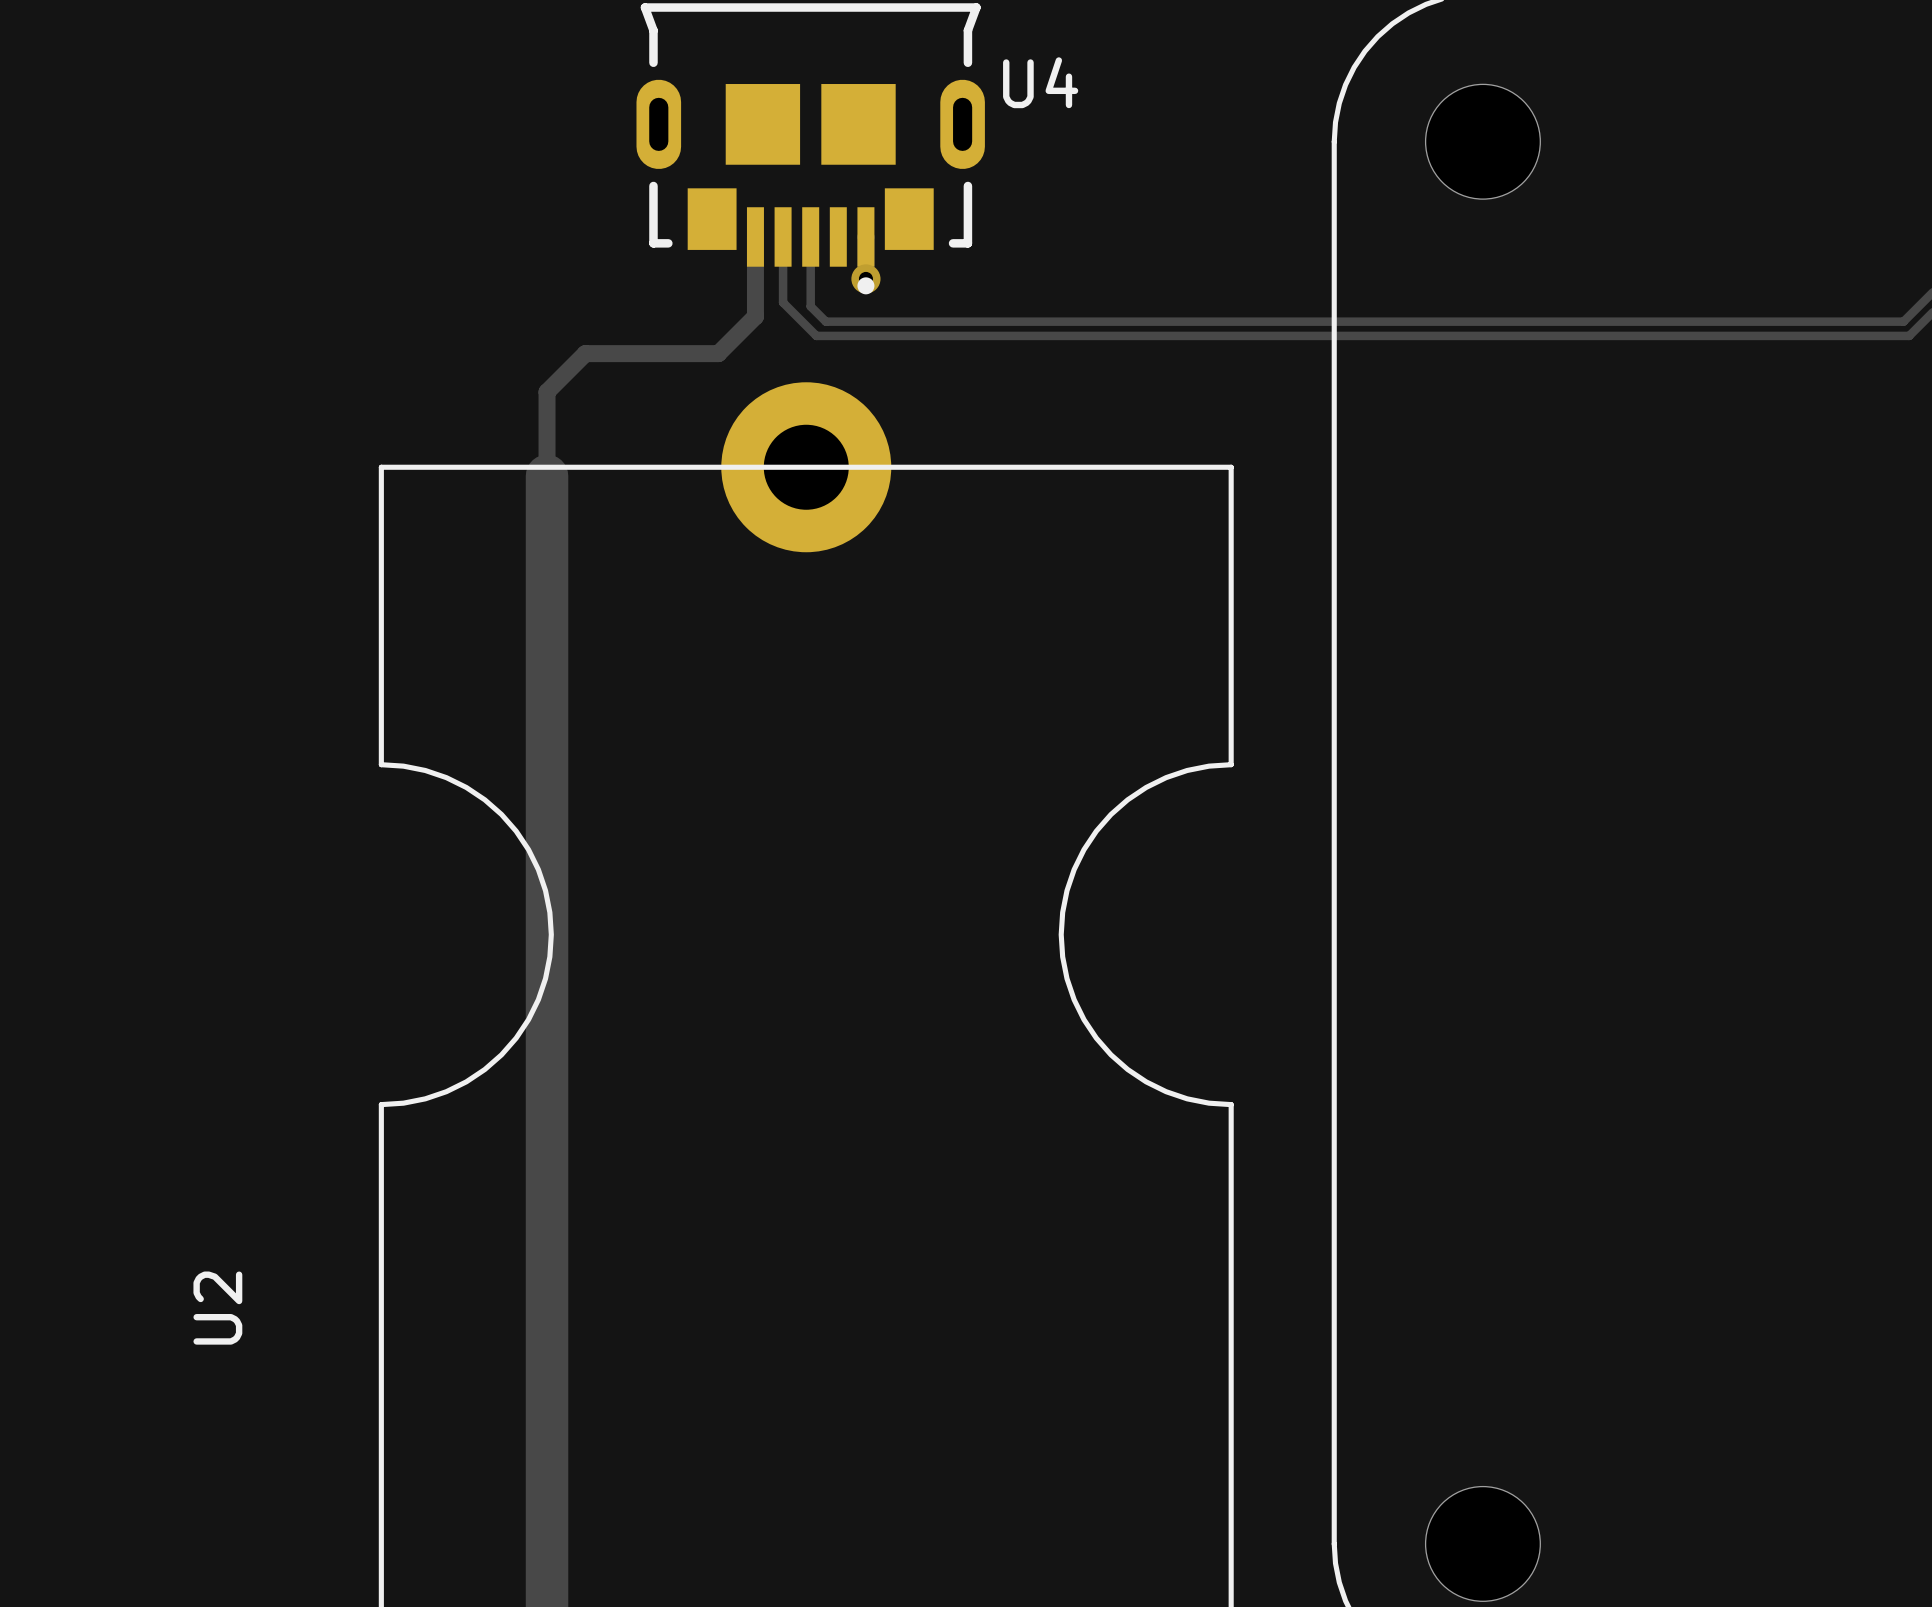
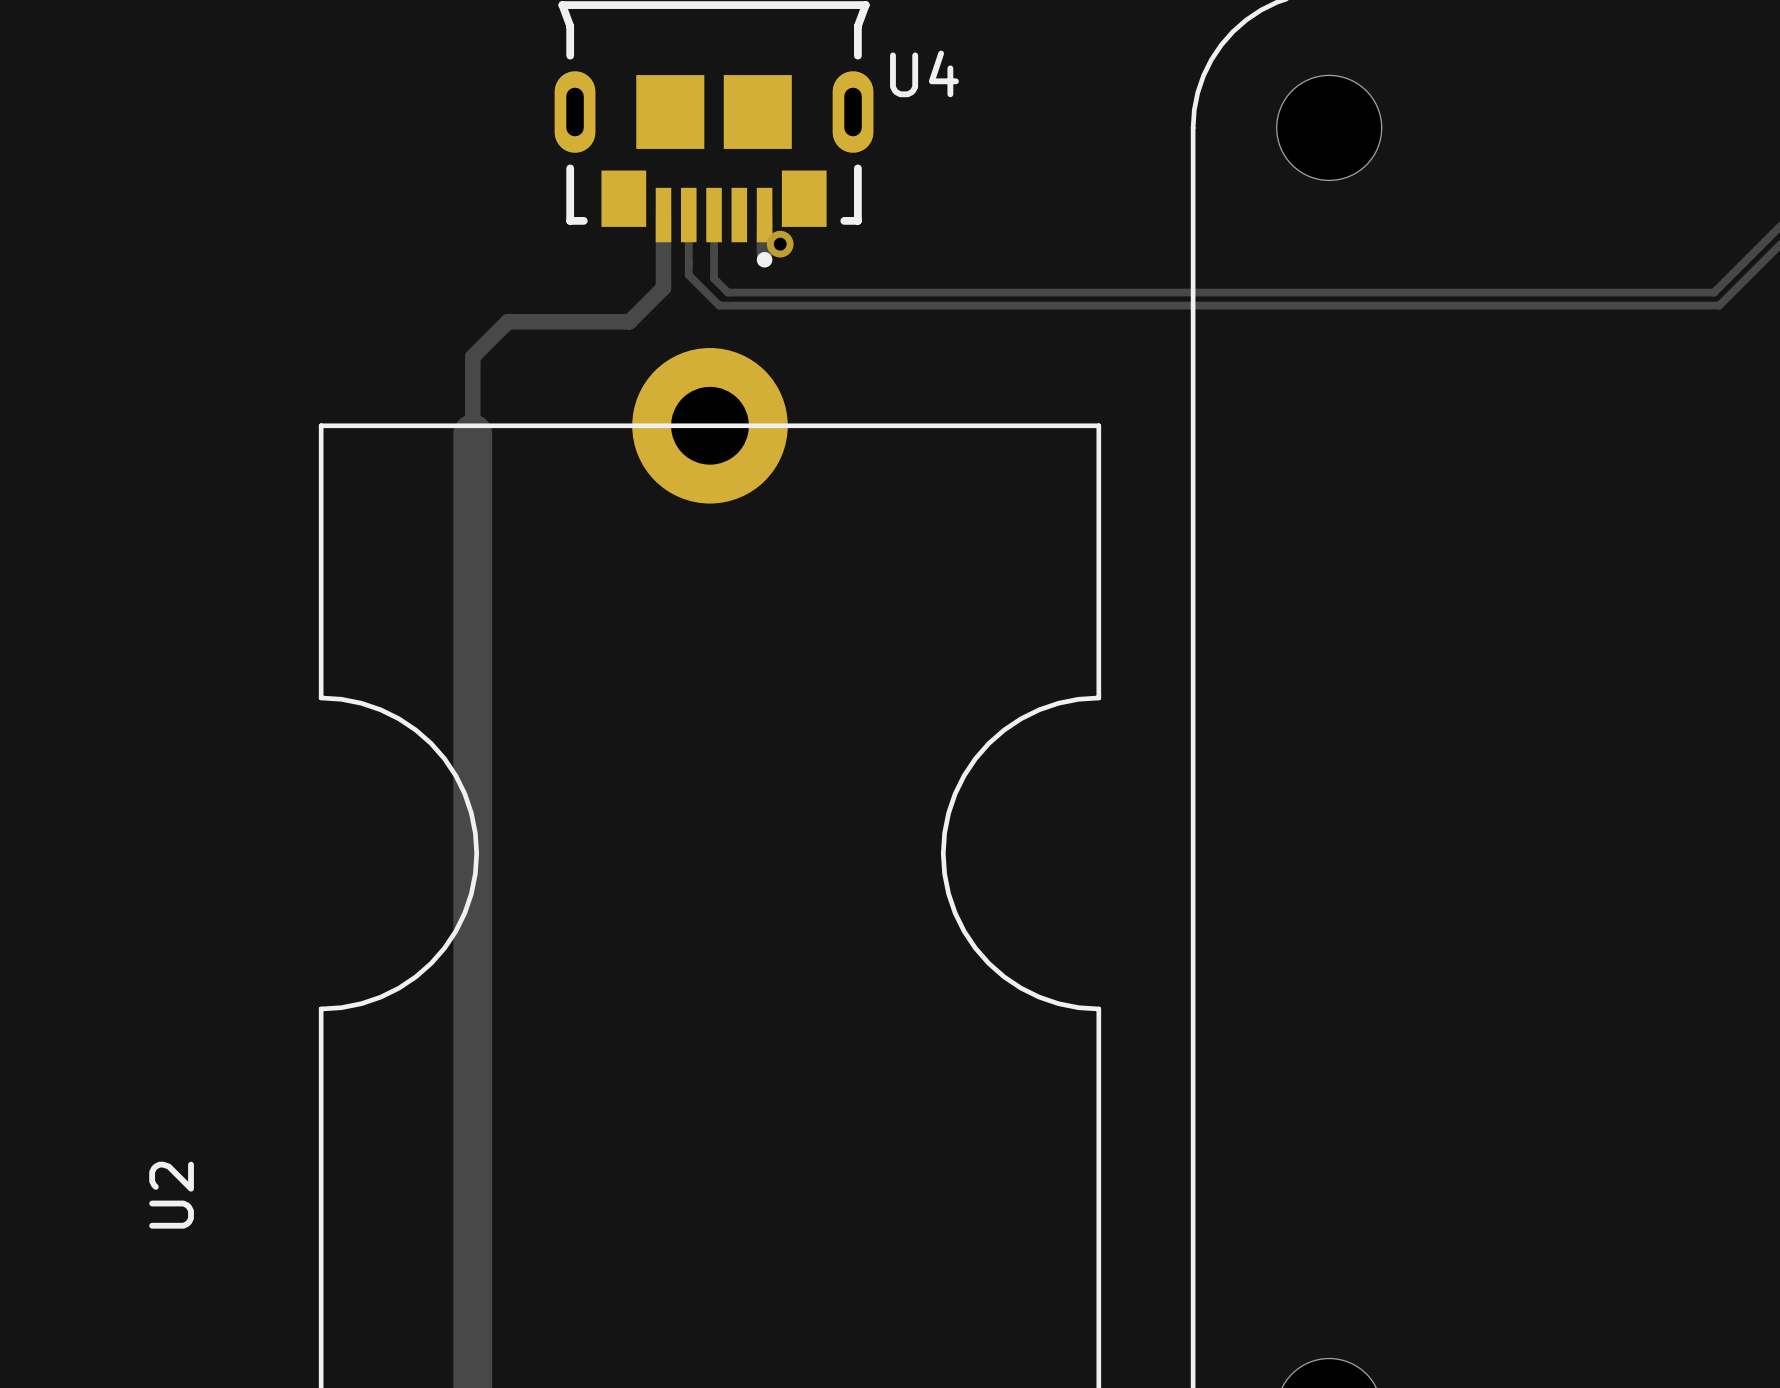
via position: (865, 278) -> (780, 244)

